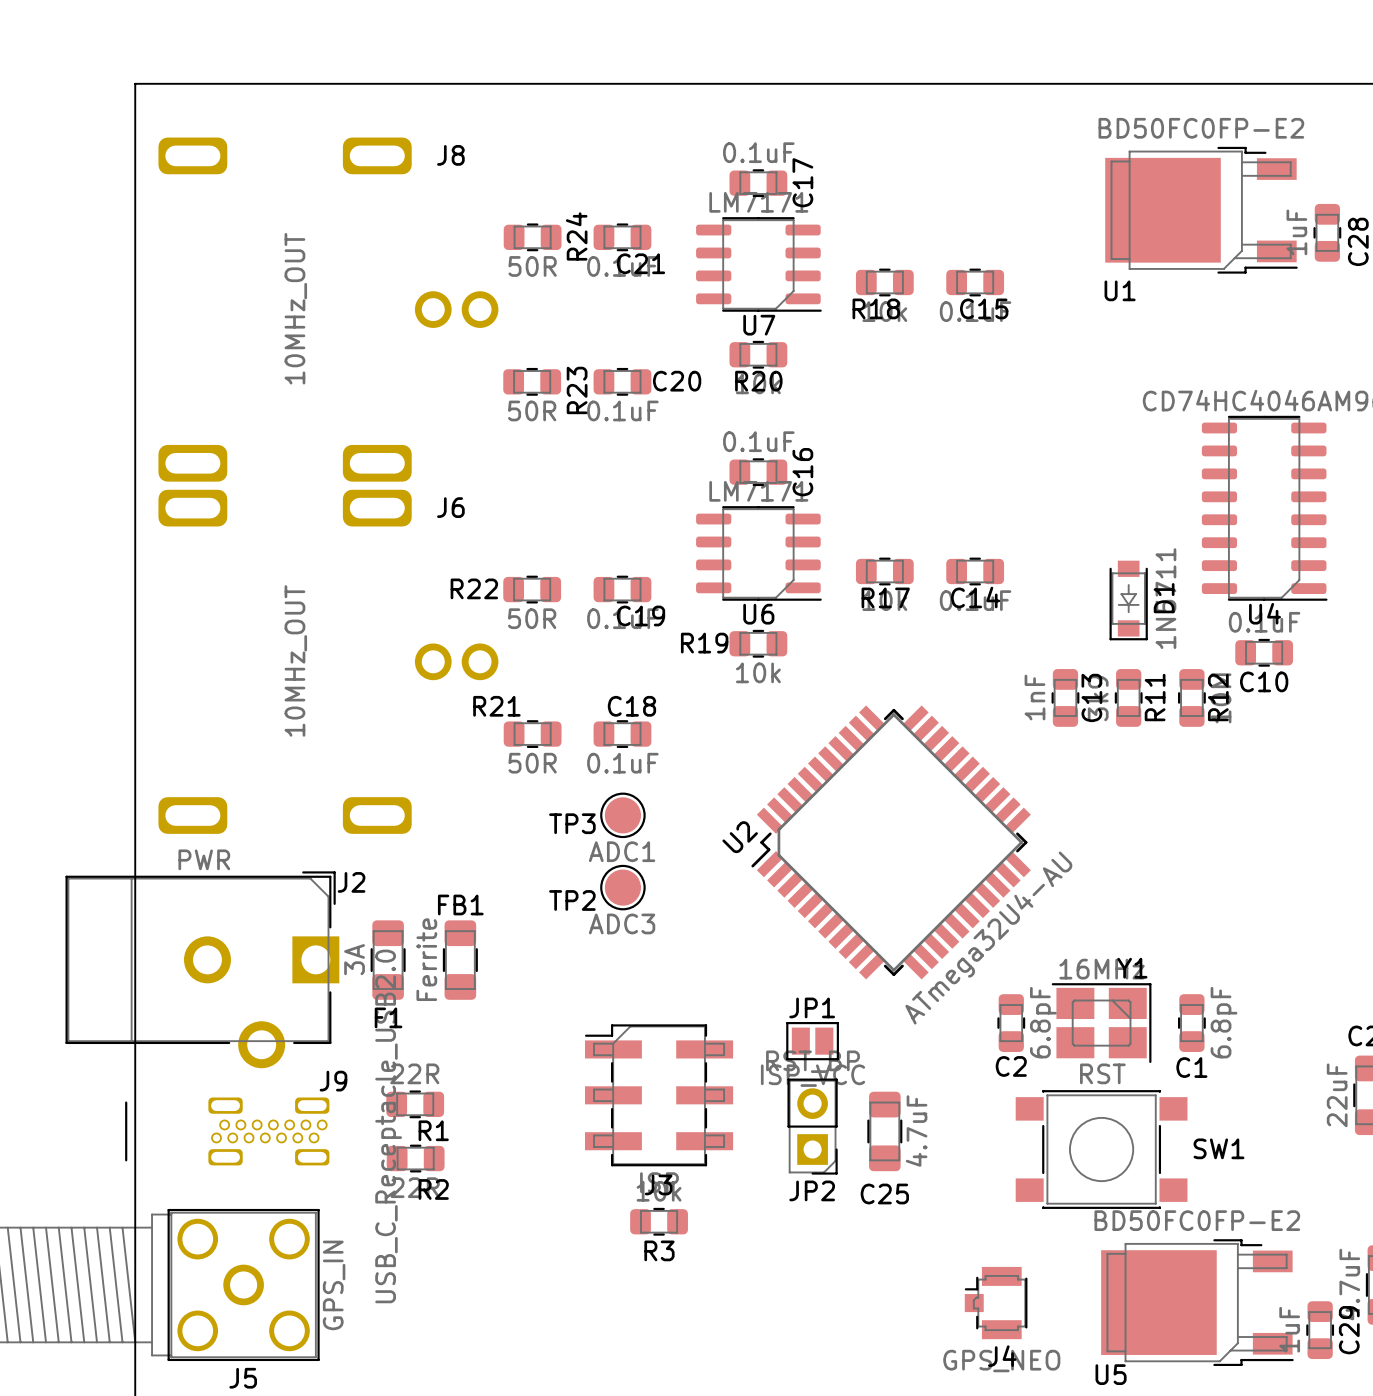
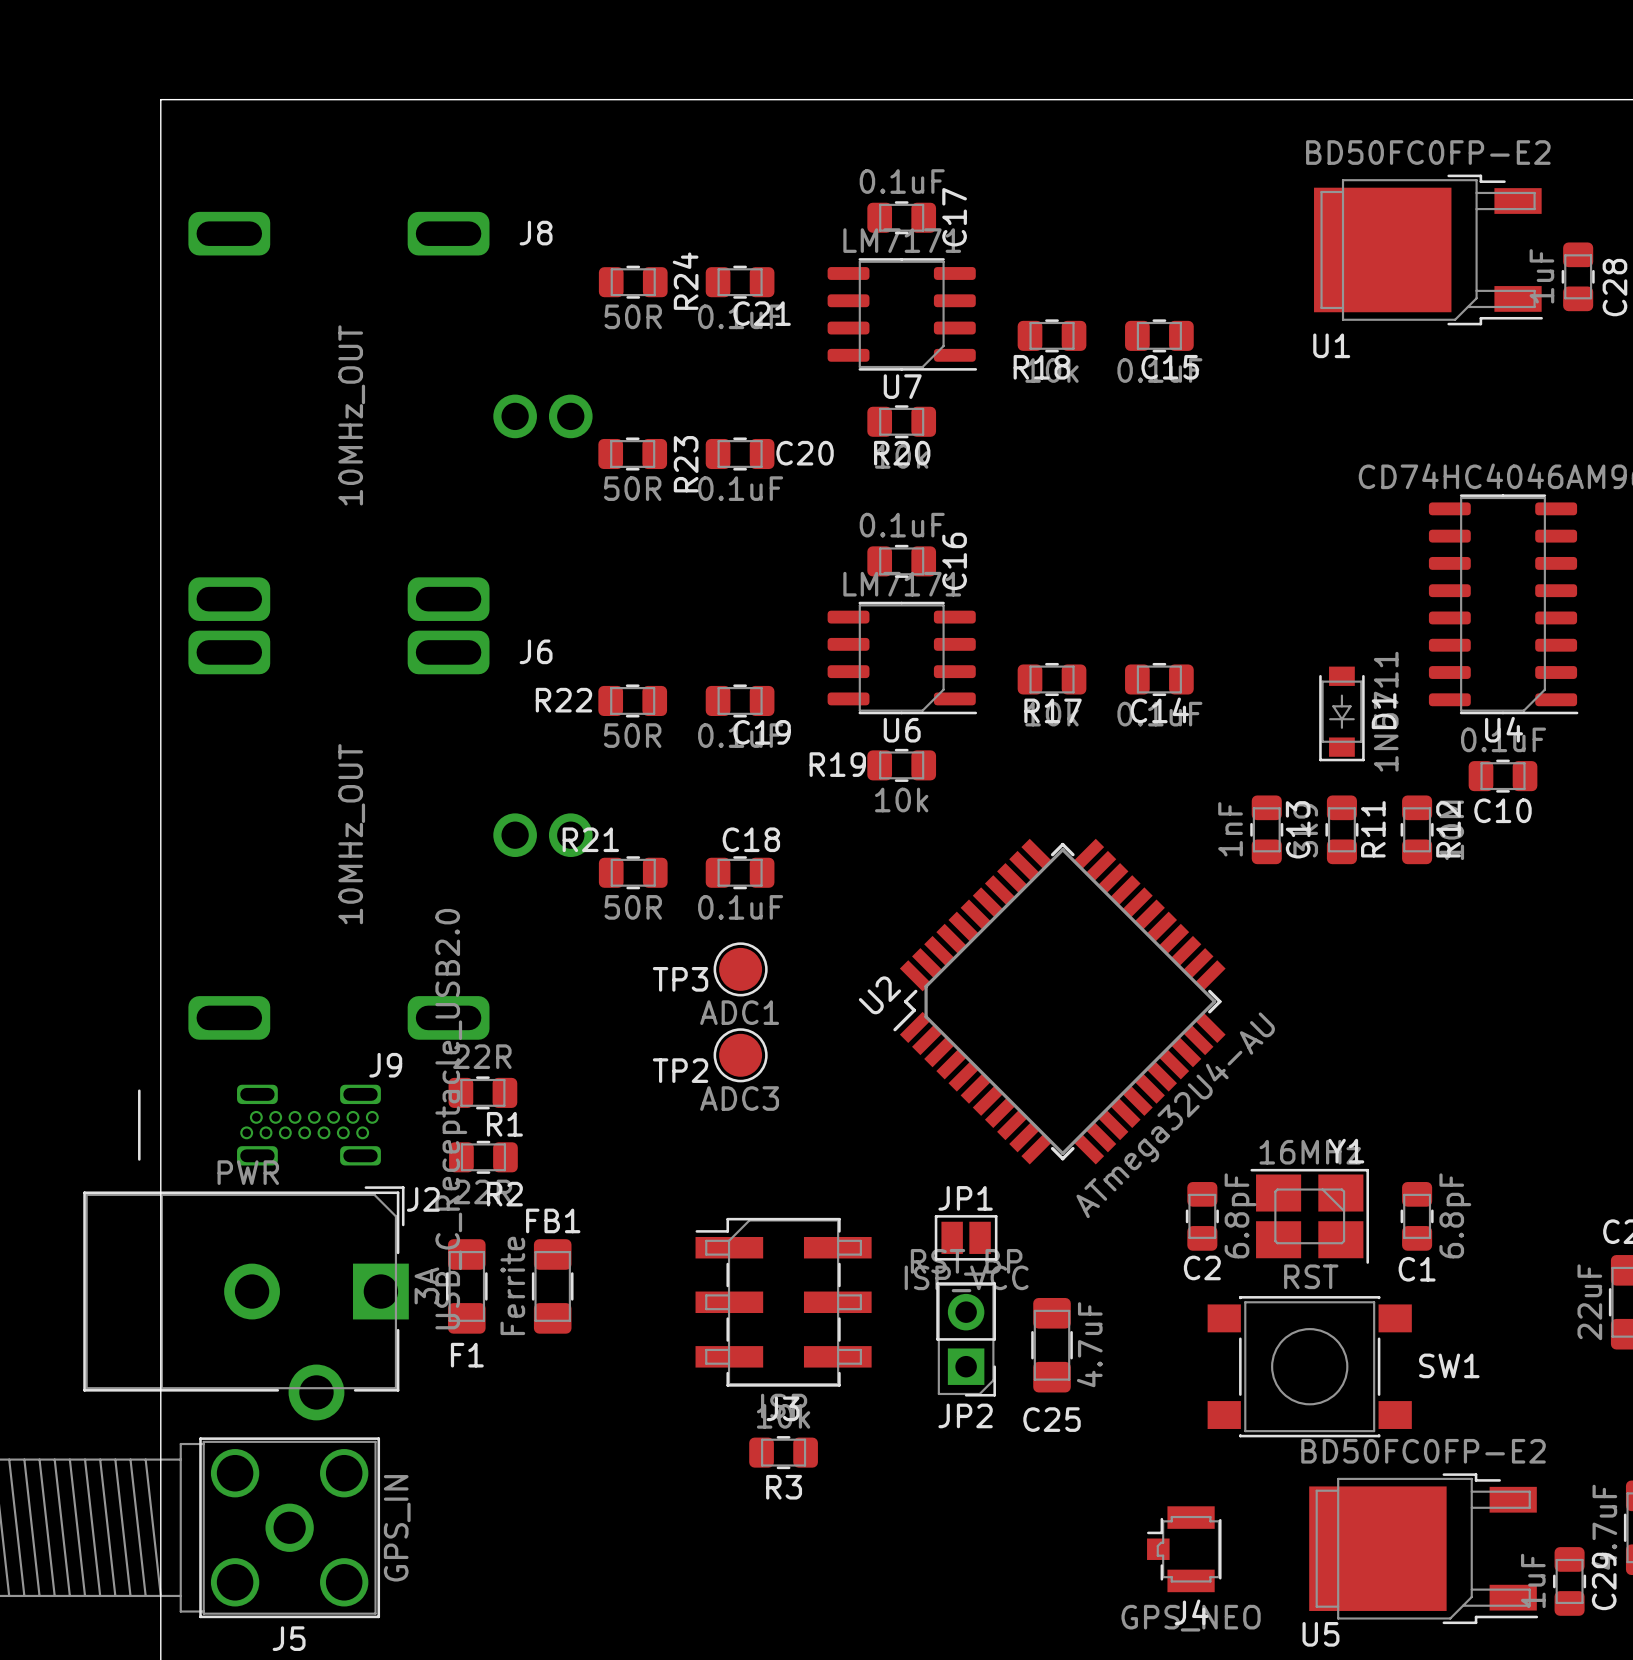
J8 position: (328, 309) -> (390, 416)
J6 position: (328, 661) -> (390, 835)
F1 position: (388, 960) -> (466, 1286)
FB1 position: (460, 960) -> (552, 1286)
J2 position: (202, 969) -> (246, 1303)
R1 position: (415, 1104) -> (482, 1092)
J9 position: (227, 1131) -> (259, 1125)
R2 position: (415, 1158) -> (483, 1157)

